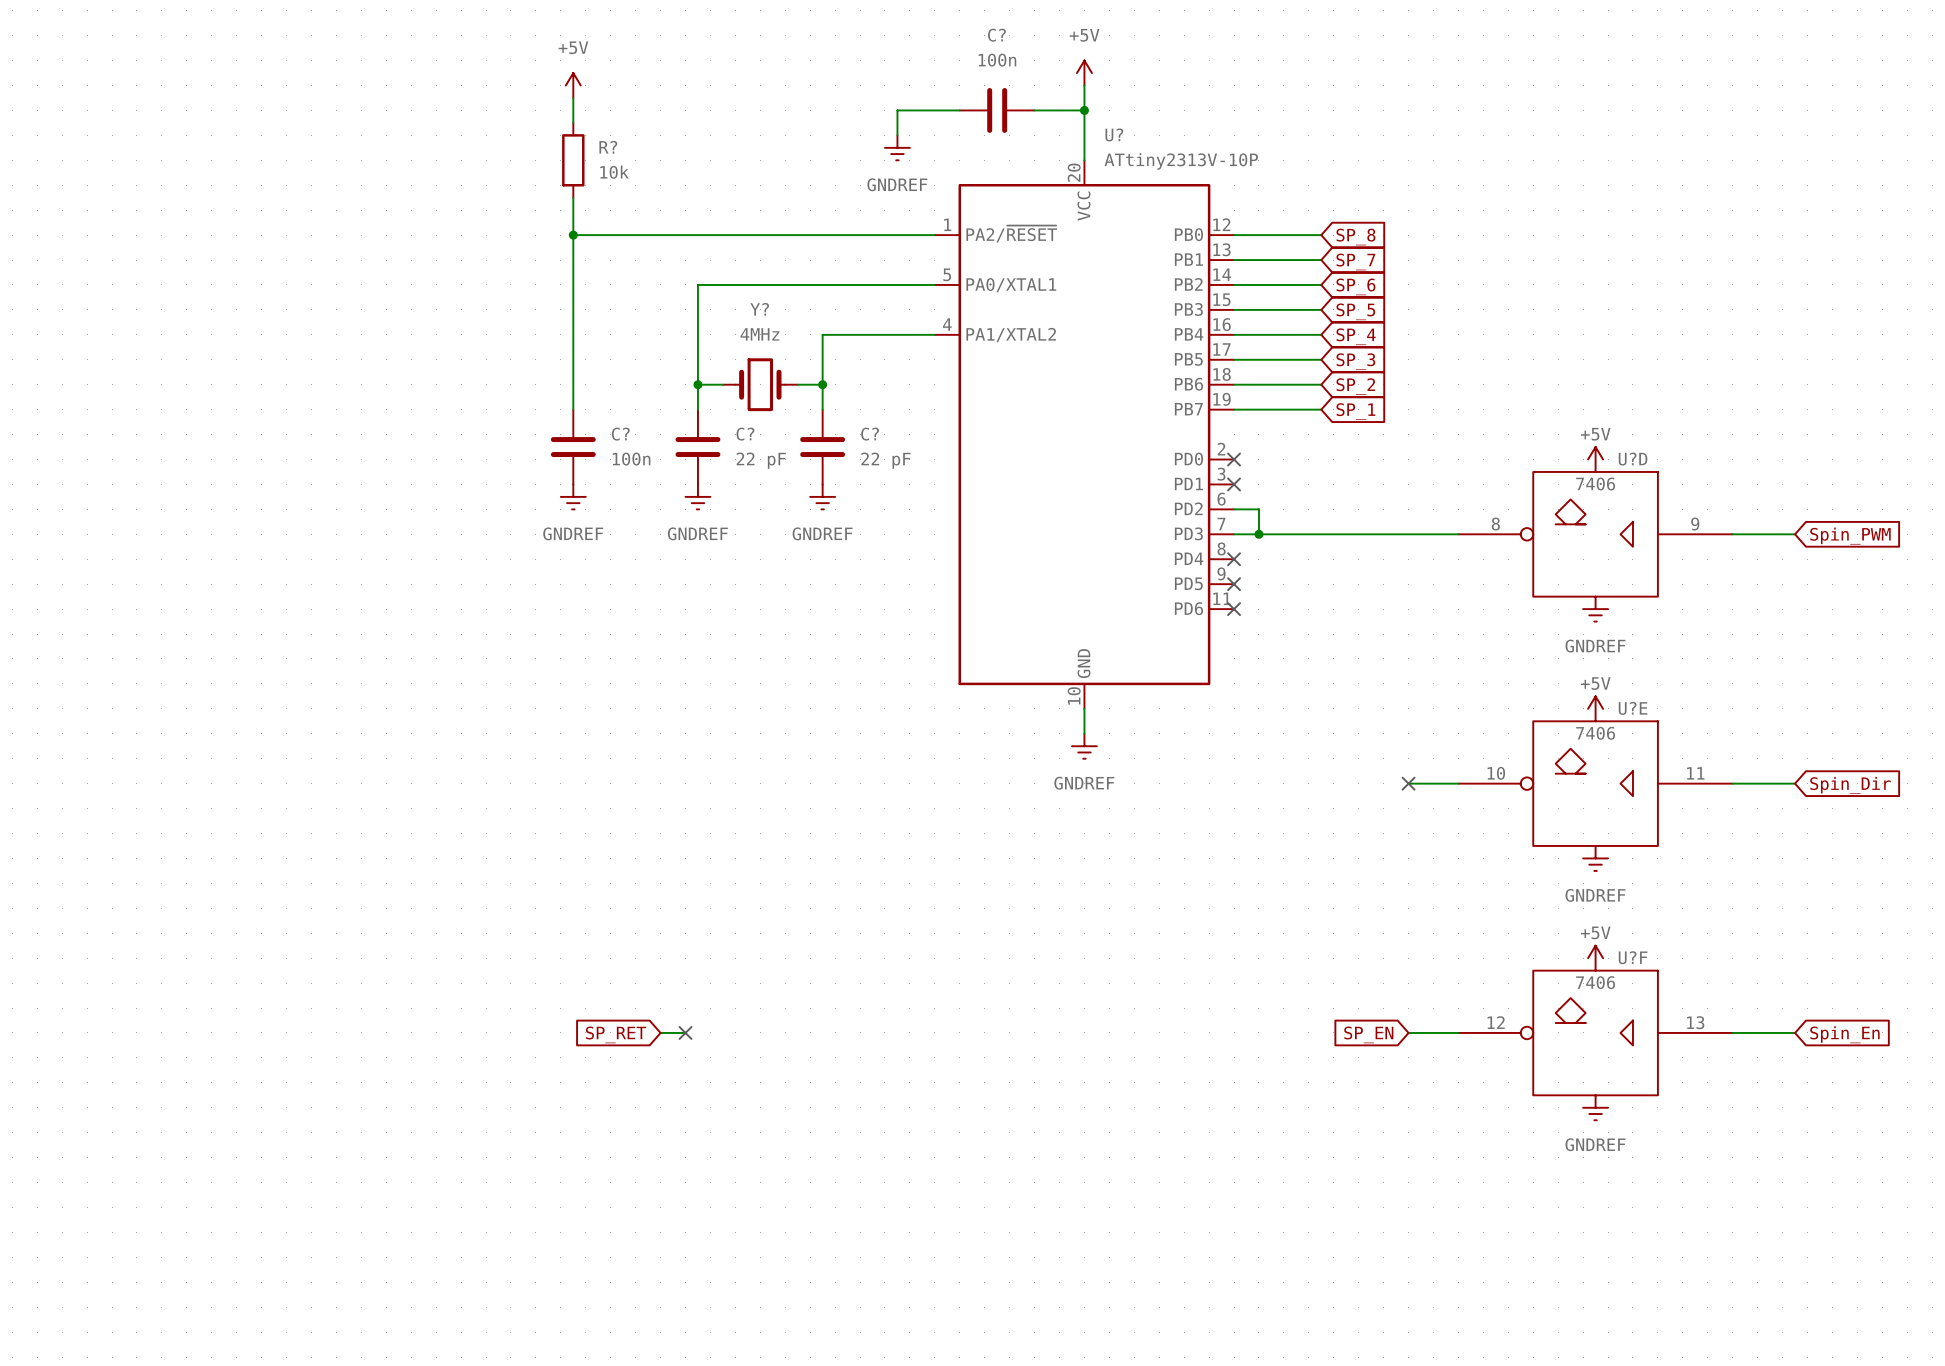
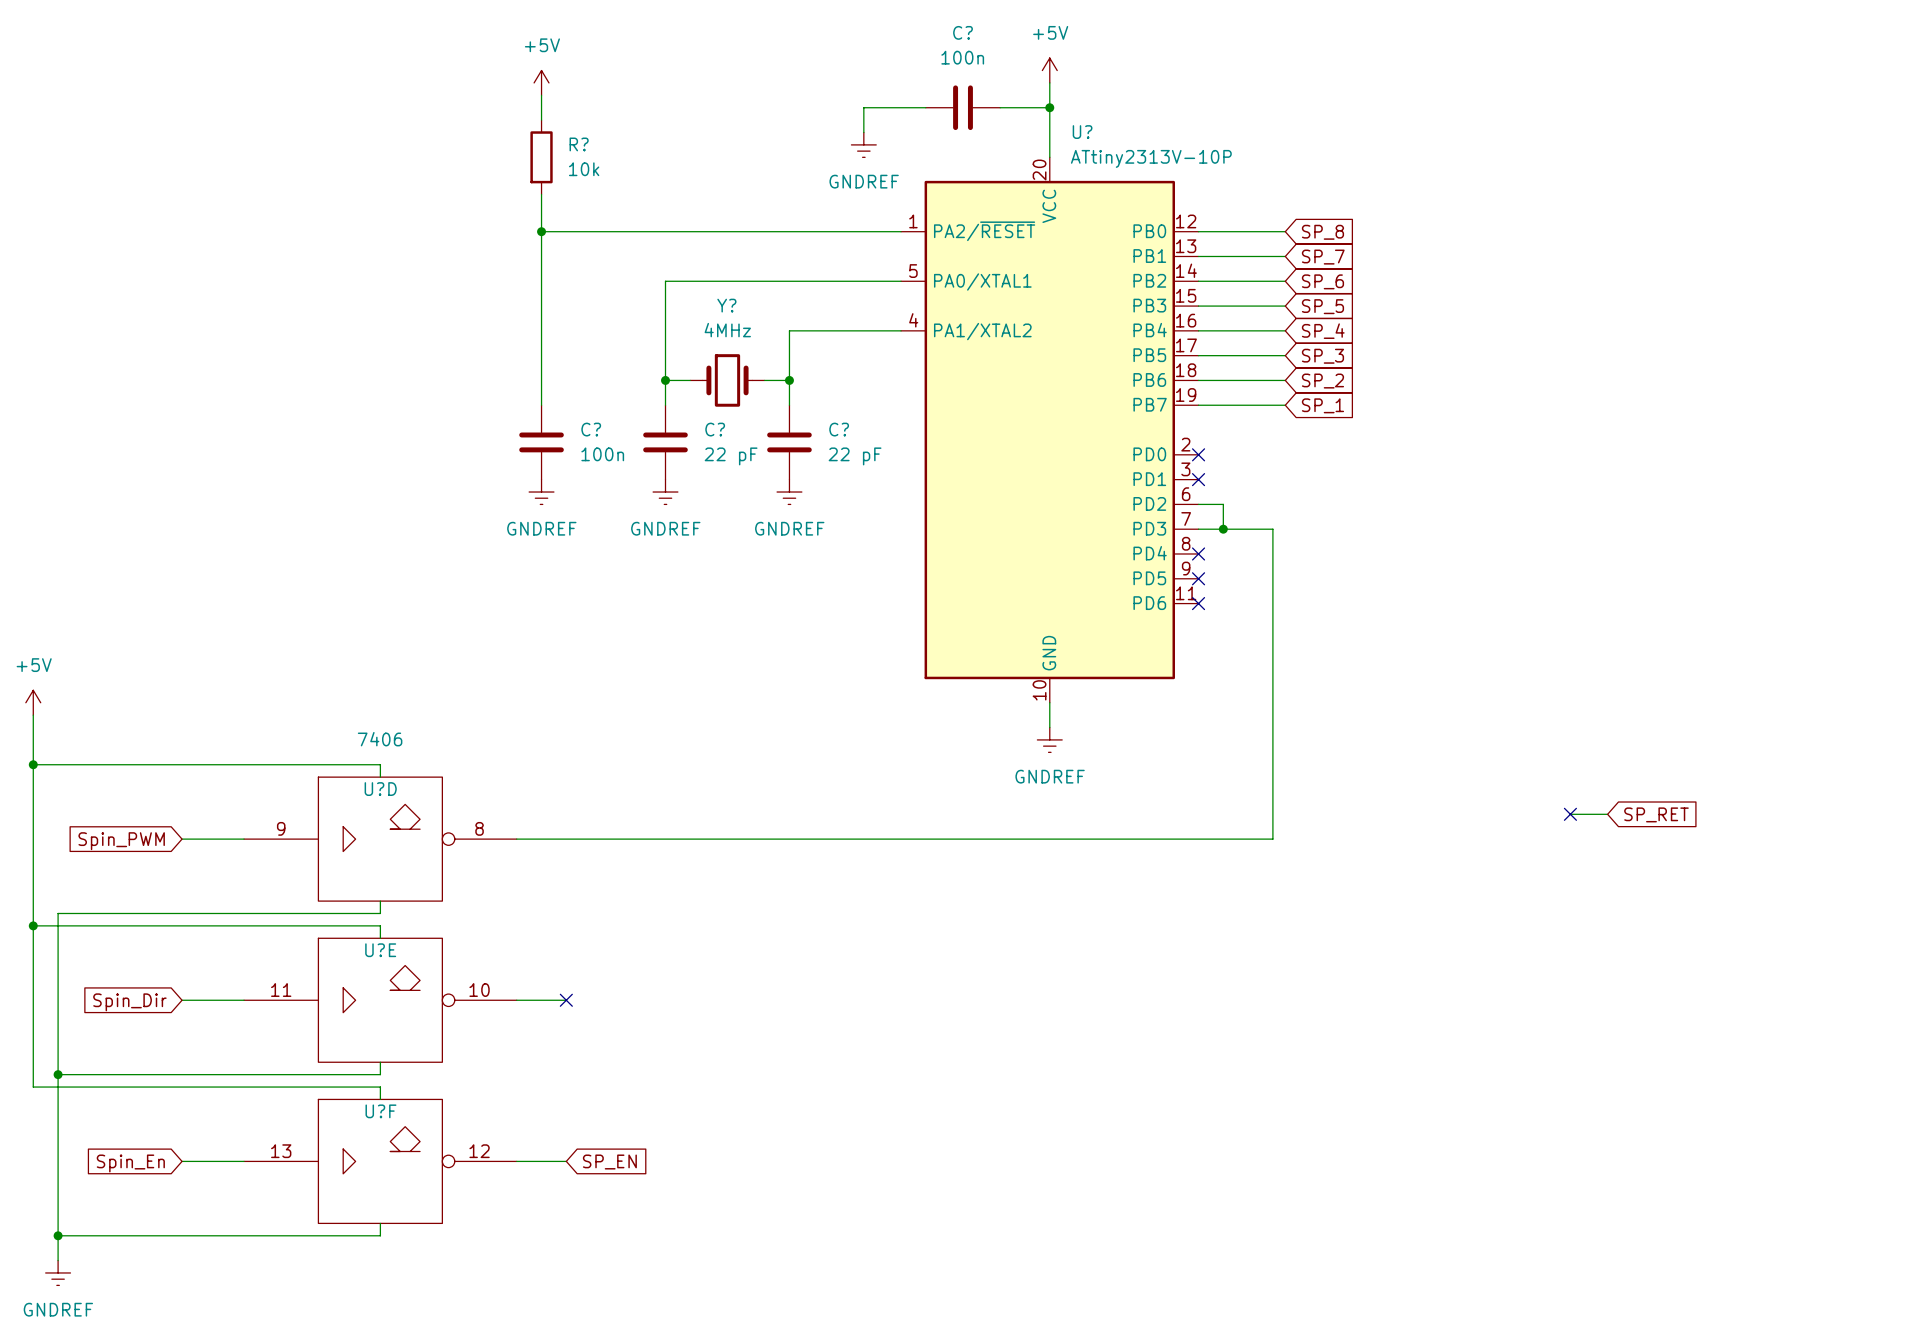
power symbol: +5V (1595, 459) -> none
wire: (1308, 534) (1458, 534) -> (1272, 529) (1272, 839) (516, 839)
U?D: 7406 (1595, 534) -> none
wire: (1732, 534) (1795, 534) -> none
global label: Spin_PWM (1850, 536) -> none
power symbol: GNDREF (1595, 609) -> none
power symbol: none -> +5V (33, 702)
power symbol: +5V (1595, 708) -> none
wire: none -> (33, 715) (33, 1087) (380, 1087) (380, 1099)
wire: none -> (33, 764) (380, 764) (380, 777)
junction: none -> (33, 764)
wire: (1408, 783) (1458, 783) -> none
no-connect mark: (1408, 783) -> none
U?E: 7406 (1595, 783) -> none
wire: (1732, 783) (1795, 783) -> none
global label: Spin_Dir (1850, 785) -> none
wire: none -> (1570, 814) (1607, 814)
no-connect mark: none -> (1570, 814)
global label: none -> SP_RET (1656, 814)
wire: none -> (182, 839) (244, 839)
U?D: none -> 7406 (380, 839)
global label: none -> Spin_PWM (121, 841)
power symbol: GNDREF (1595, 858) -> none
wire: none -> (380, 901) (380, 913) (58, 913) (58, 1260)
wire: none -> (33, 925) (380, 925) (380, 938)
junction: none -> (33, 925)
power symbol: +5V (1595, 958) -> none
wire: none -> (182, 1000) (244, 1000)
U?E: none -> (380, 1000)
wire: none -> (516, 1000) (566, 1000)
no-connect mark: none -> (566, 1000)
global label: none -> Spin_Dir (129, 1002)
wire: (660, 1032) (685, 1032) -> none
no-connect mark: (685, 1032) -> none
wire: (1408, 1032) (1458, 1032) -> none
U?F: 7406 (1595, 1032) -> none
wire: (1732, 1032) (1795, 1032) -> none
global label: SP_RET (616, 1034) -> none
global label: SP_EN (1368, 1034) -> none
global label: Spin_En (1844, 1034) -> none
wire: none -> (380, 1062) (380, 1074) (58, 1074)
junction: none -> (58, 1074)
power symbol: GNDREF (1595, 1107) -> none
wire: none -> (182, 1161) (244, 1161)
U?F: none -> (380, 1161)
wire: none -> (516, 1161) (566, 1161)
global label: none -> Spin_En (130, 1163)
global label: none -> SP_EN (609, 1162)
wire: none -> (380, 1223) (380, 1235) (58, 1235)
junction: none -> (58, 1235)
power symbol: none -> GNDREF (58, 1272)

